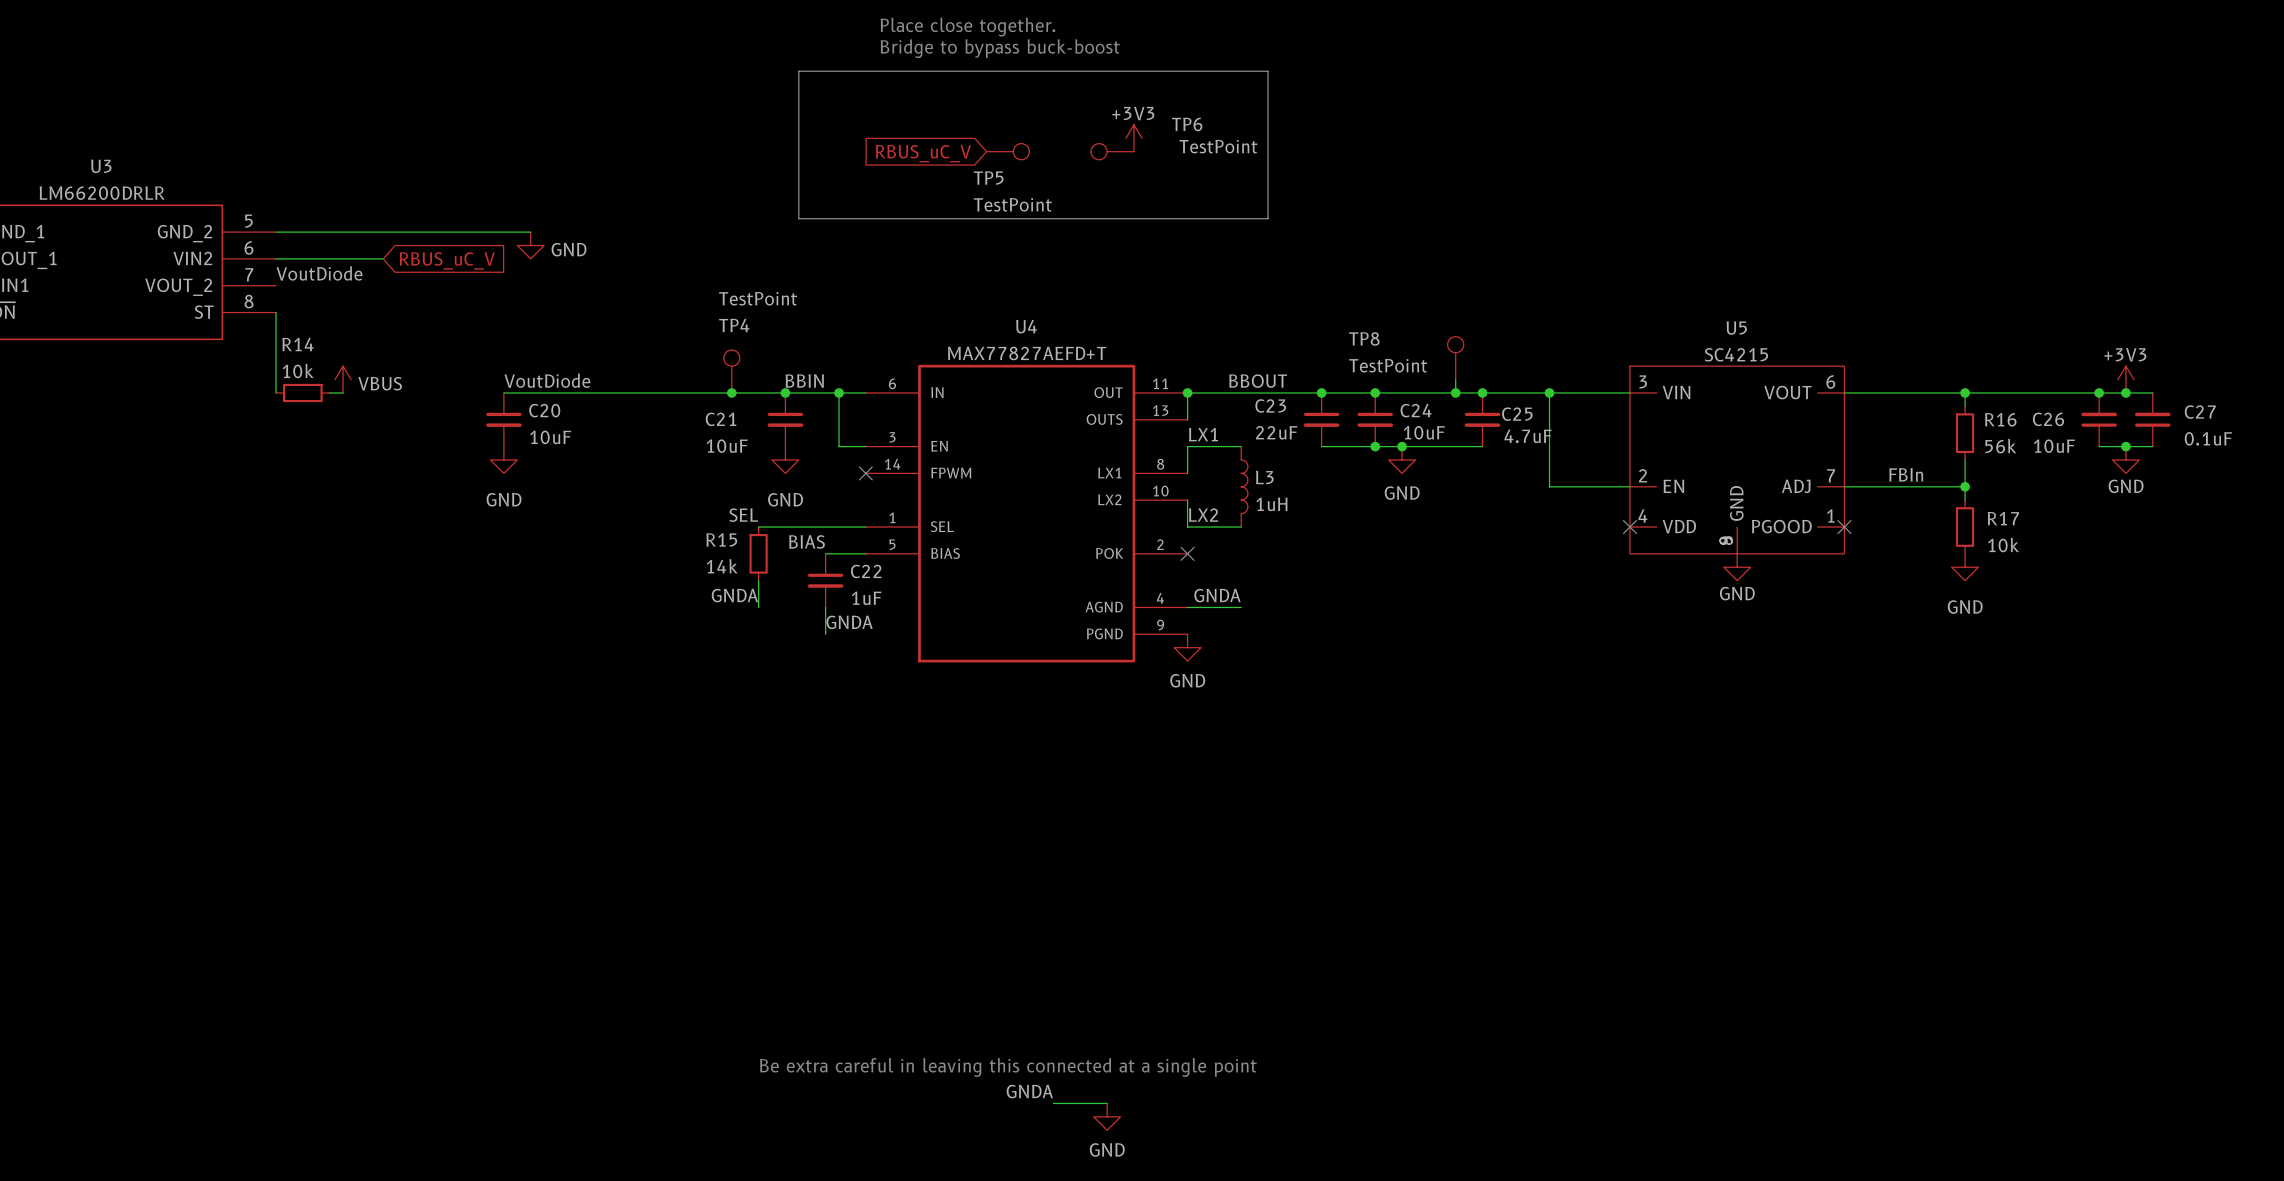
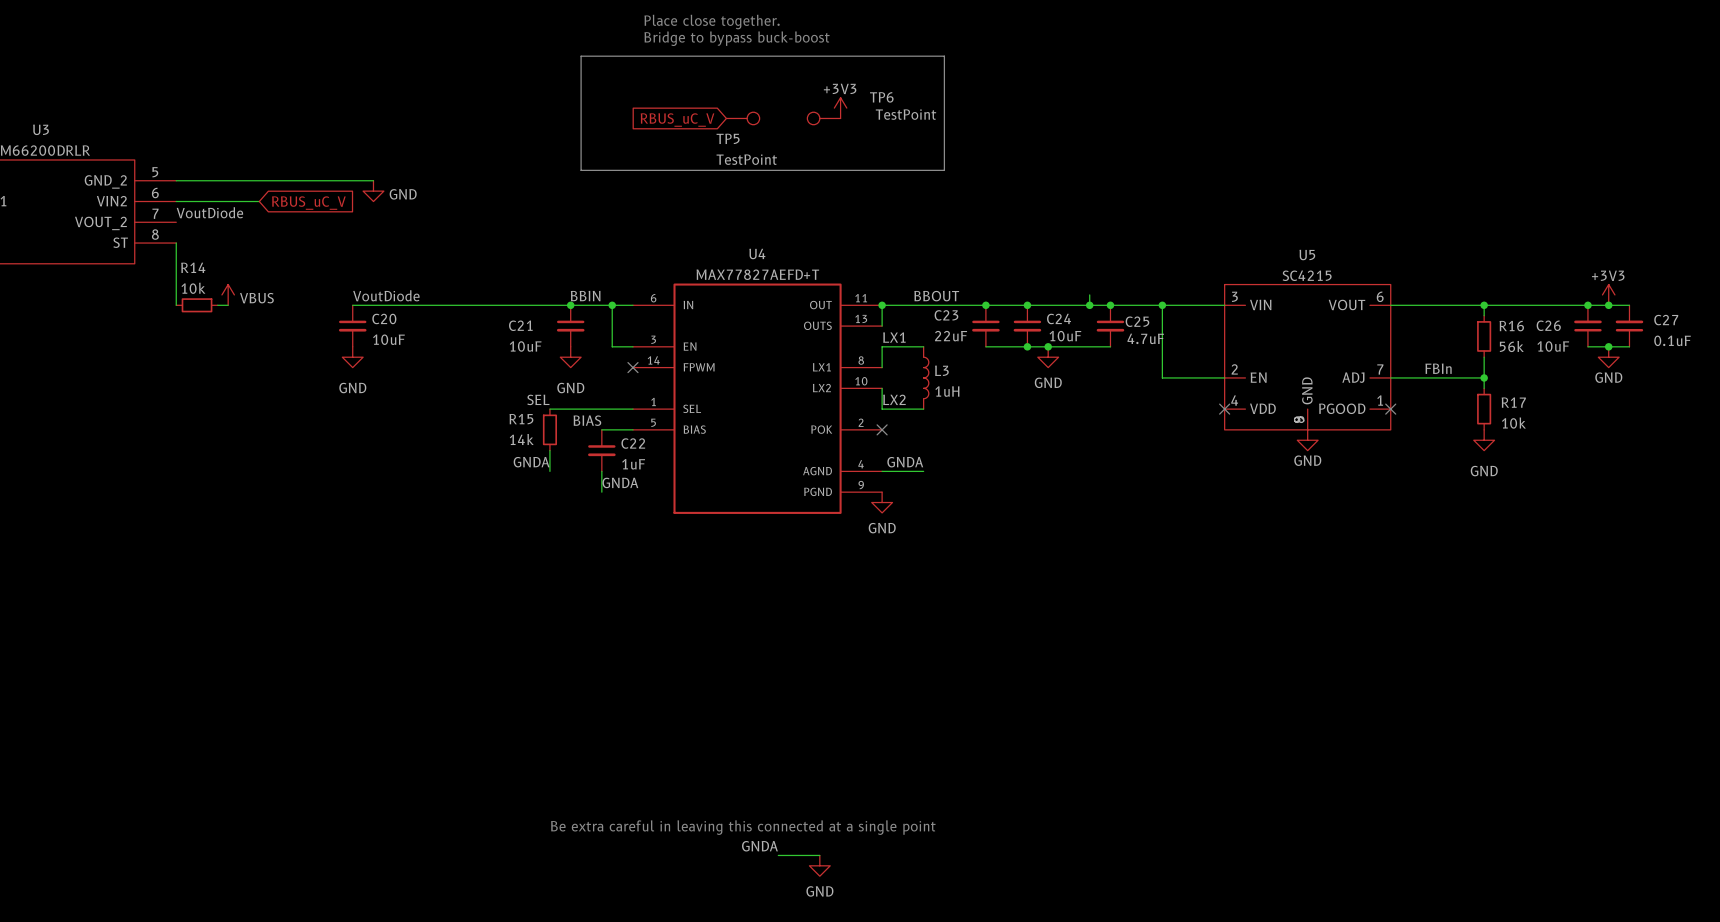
TP8: TestPoint (1455, 358) -> none
TP4: TestPoint (731, 371) -> none
junction: (731, 392) -> none

